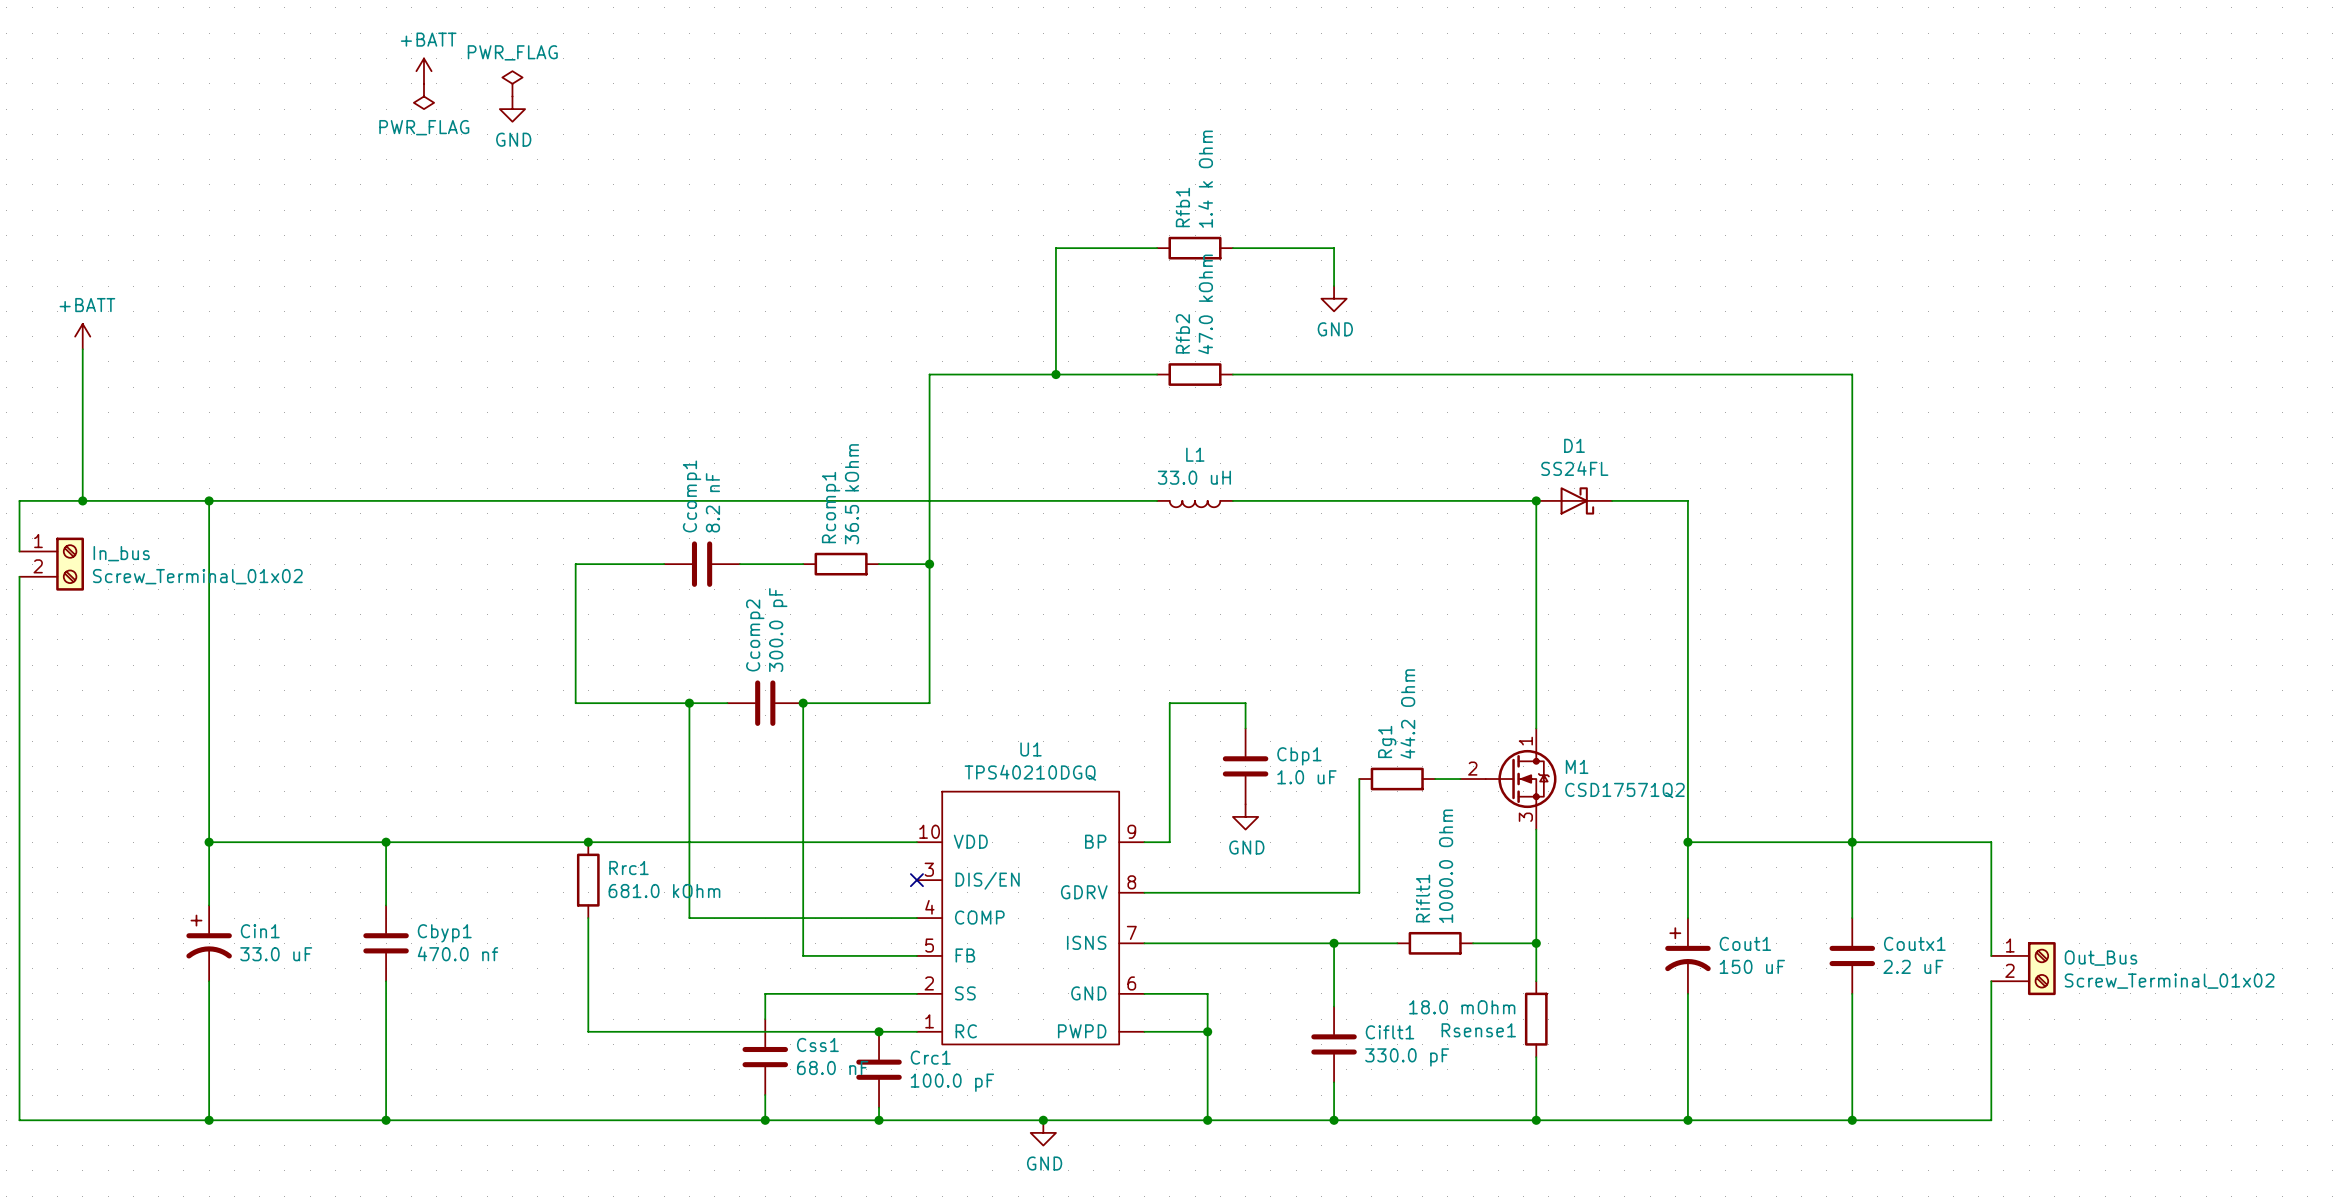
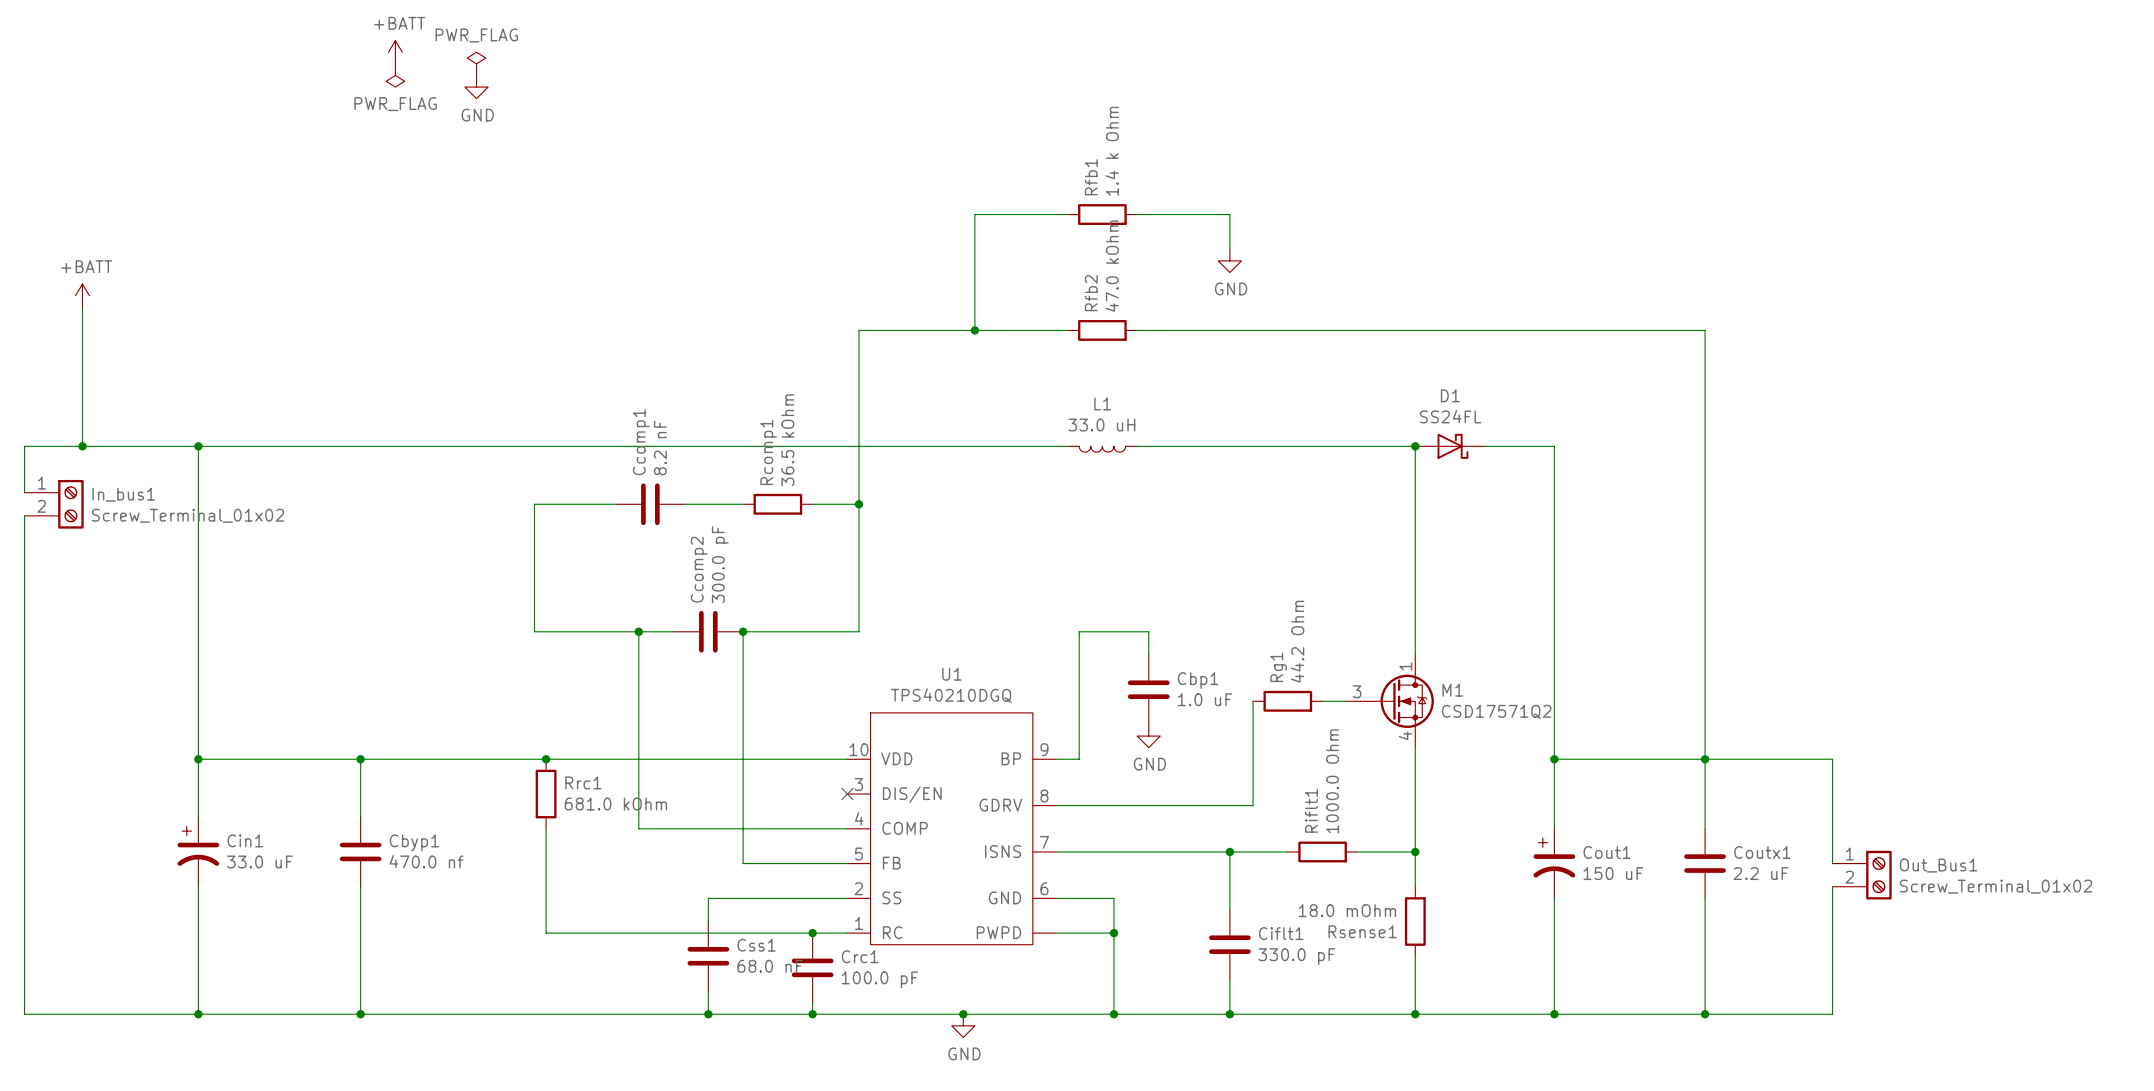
In_bus name: In_bus (121, 553) -> In_bus1 (123, 494)
M1 pin number: 2 (1472, 768) -> 3 (1357, 691)
M1 pin number: 3 (1525, 817) -> 4 (1405, 735)
Out_Bus name: Out_Bus (2101, 958) -> Out_Bus1 (1938, 865)

